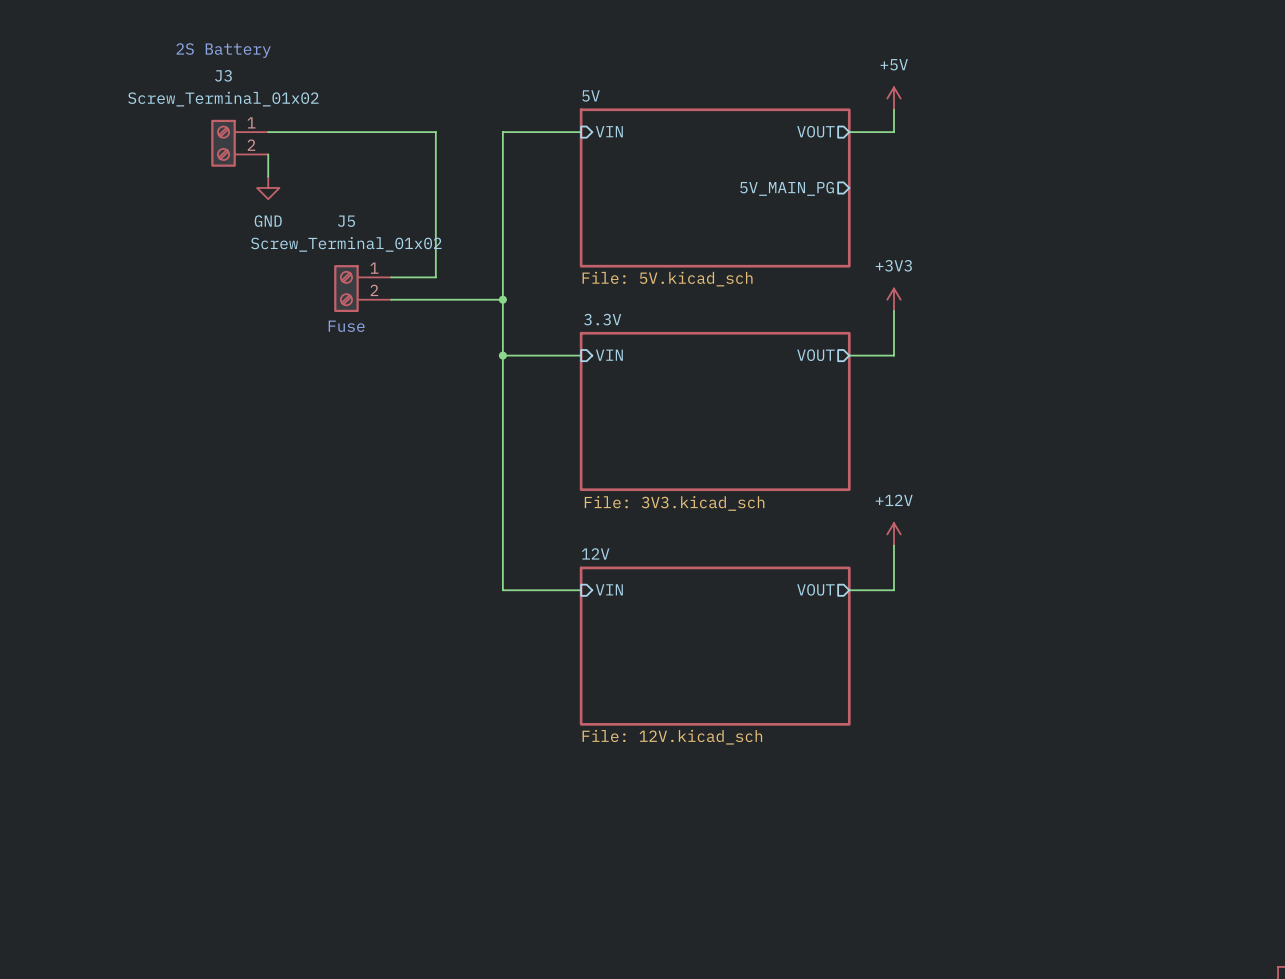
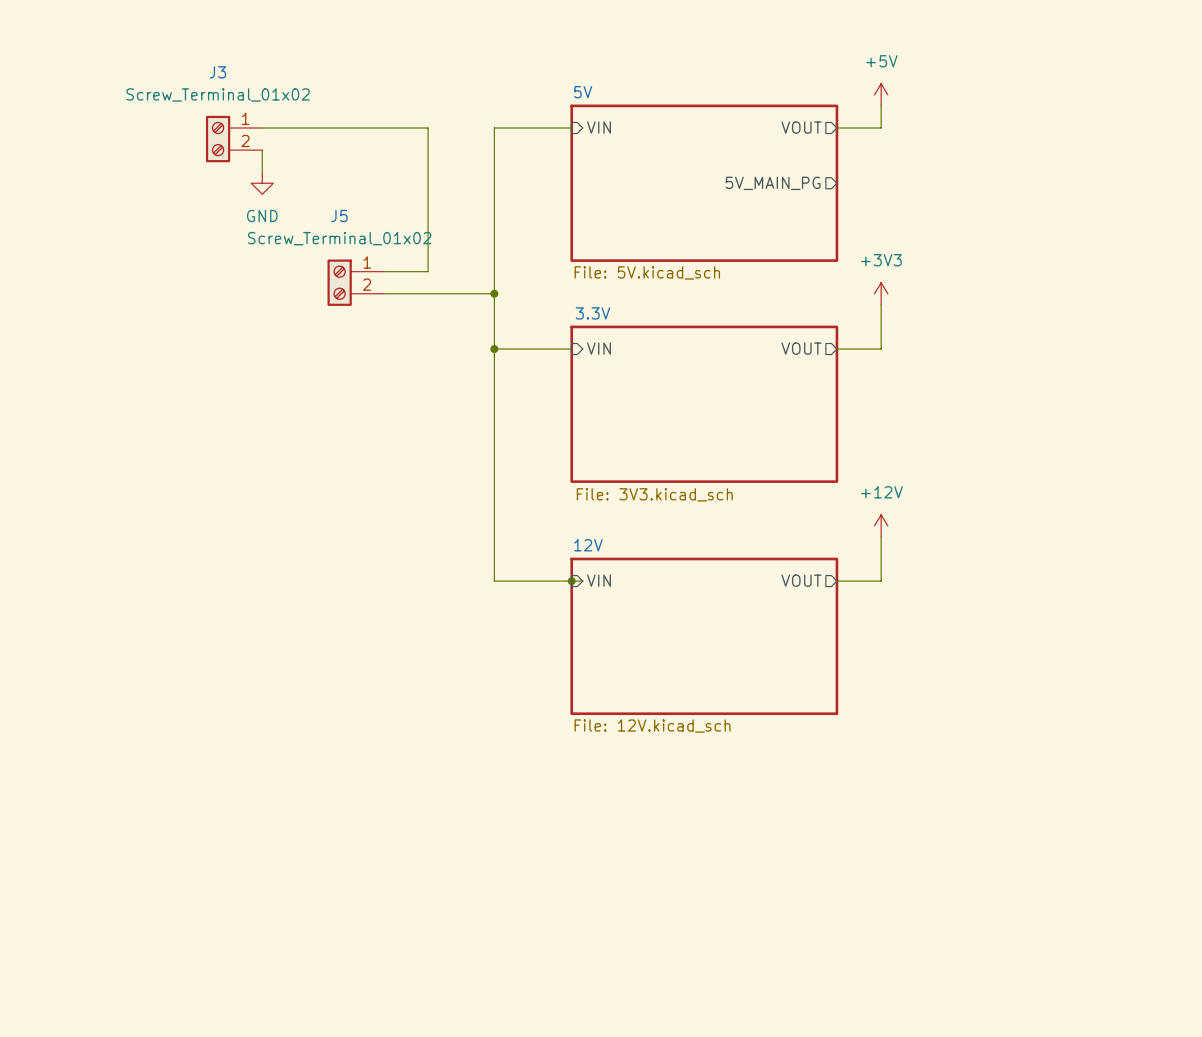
text: 2S Battery (223, 50) -> none
text: Fuse (346, 326) -> none
wire: none -> (571, 581) (582, 581)
junction: none -> (571, 581)

